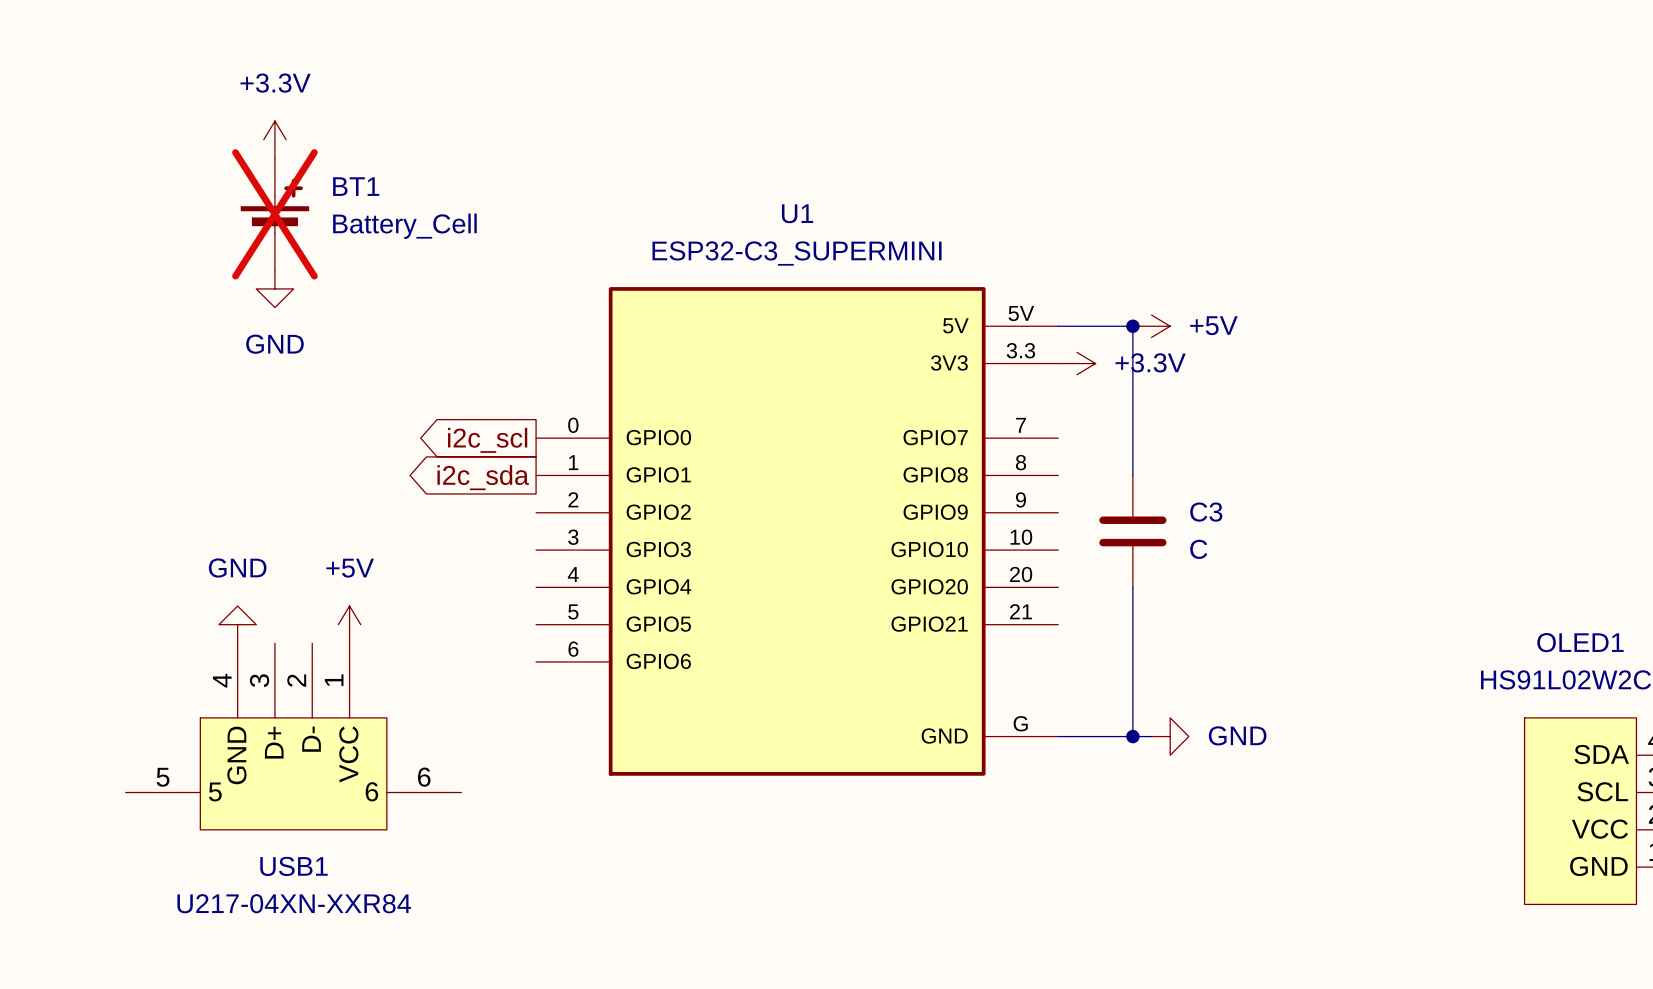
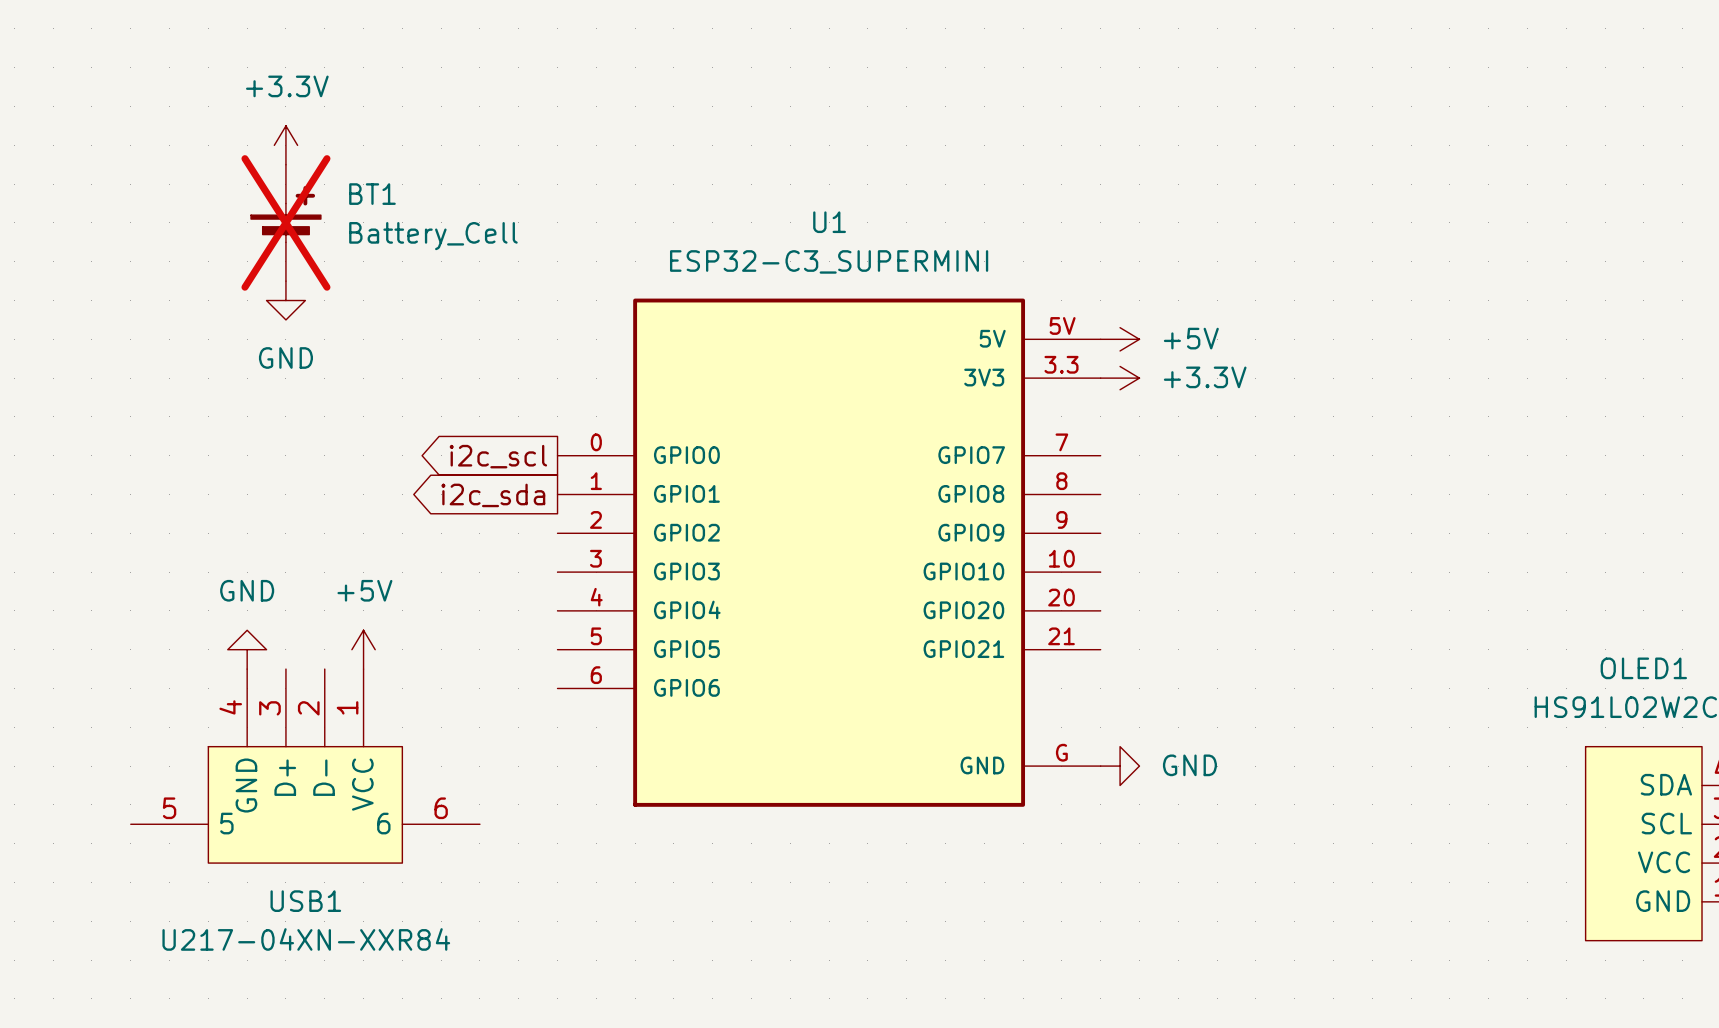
wire: (1058, 326) (1132, 326) (1132, 475) -> none
junction: (1132, 326) -> none
power symbol position: +5V (1151, 326) -> +5V (1120, 339)
C3: C (1132, 531) -> none
wire: (1132, 587) (1132, 736) -> none
wire: (1058, 736) (1151, 736) -> none
junction: (1132, 736) -> none
power symbol position: GND (1170, 736) -> GND (1120, 766)

